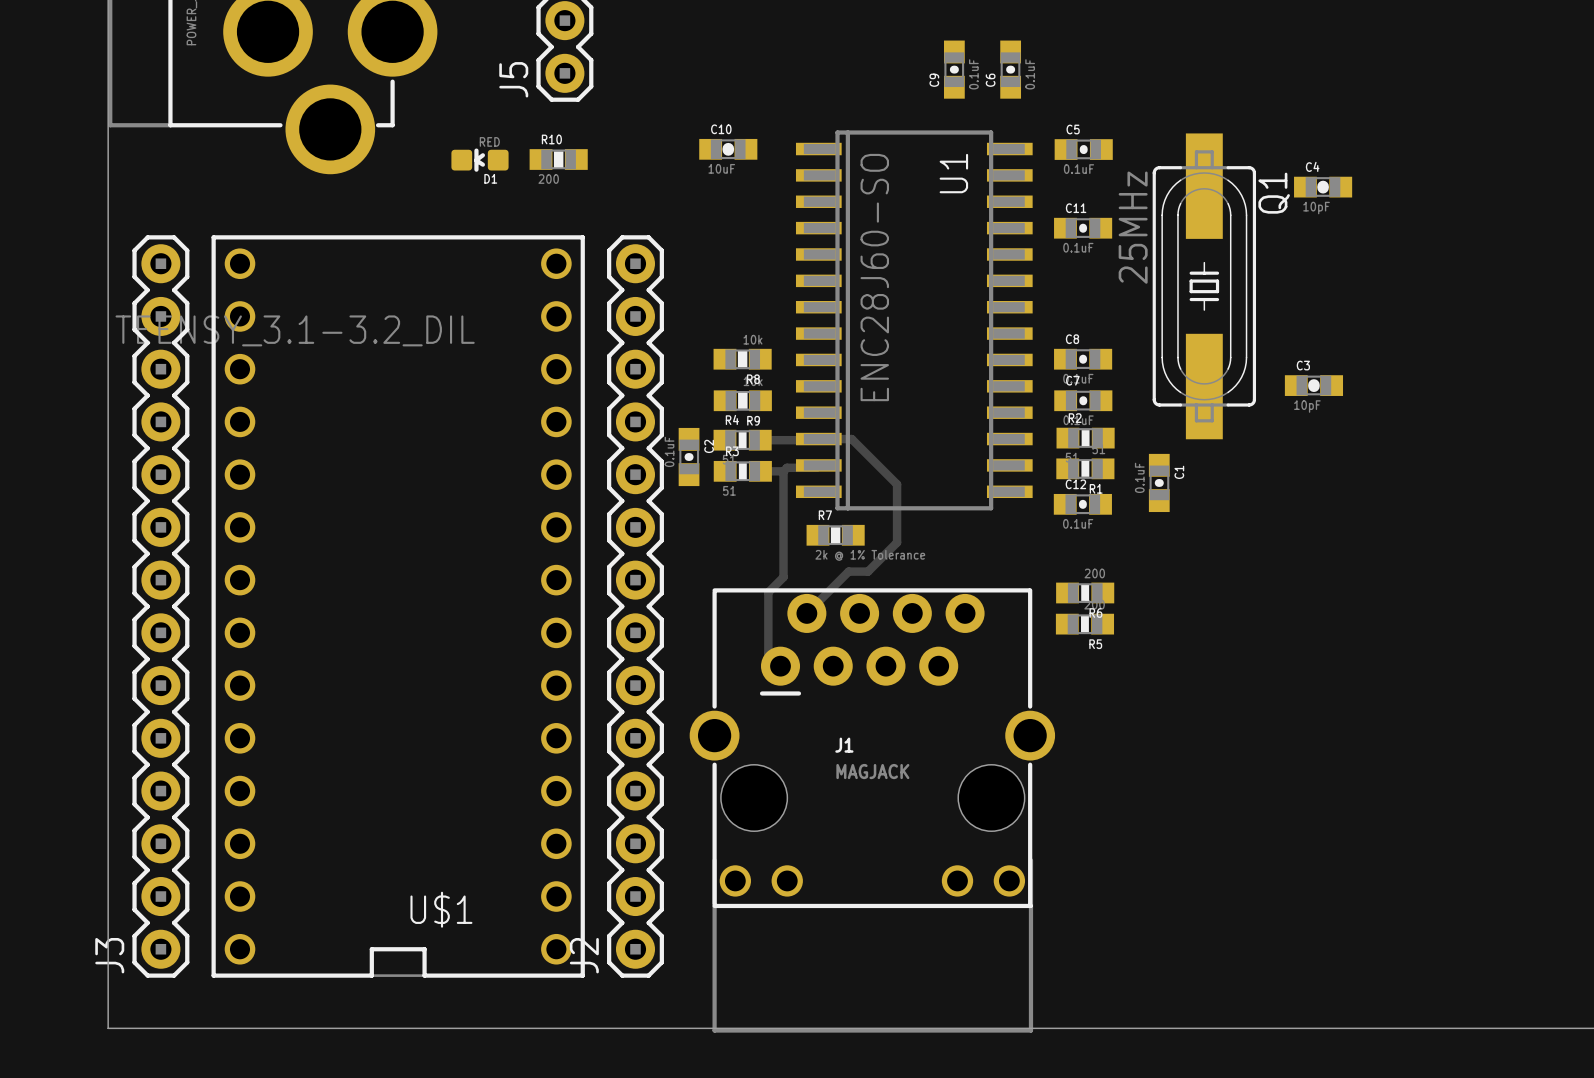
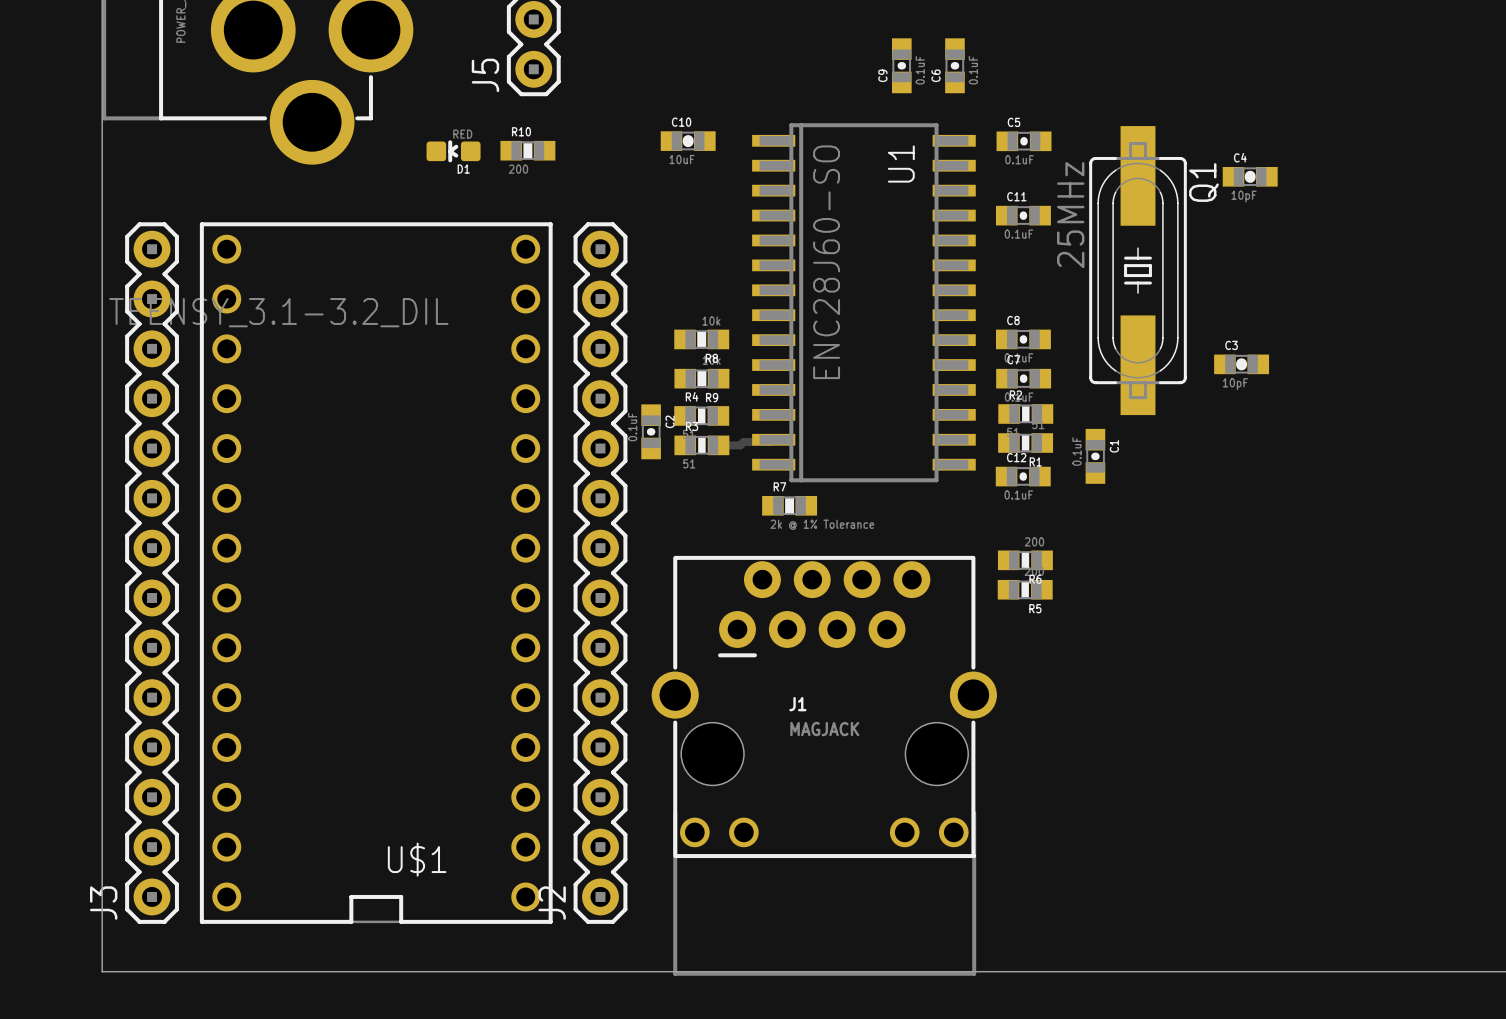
track: (760, 440) (851, 439) (897, 484) (897, 542) (868, 571) (848, 571) (806, 613) -> none
track: (783, 471) (783, 577) (768, 592) (768, 654) (780, 666) -> none

